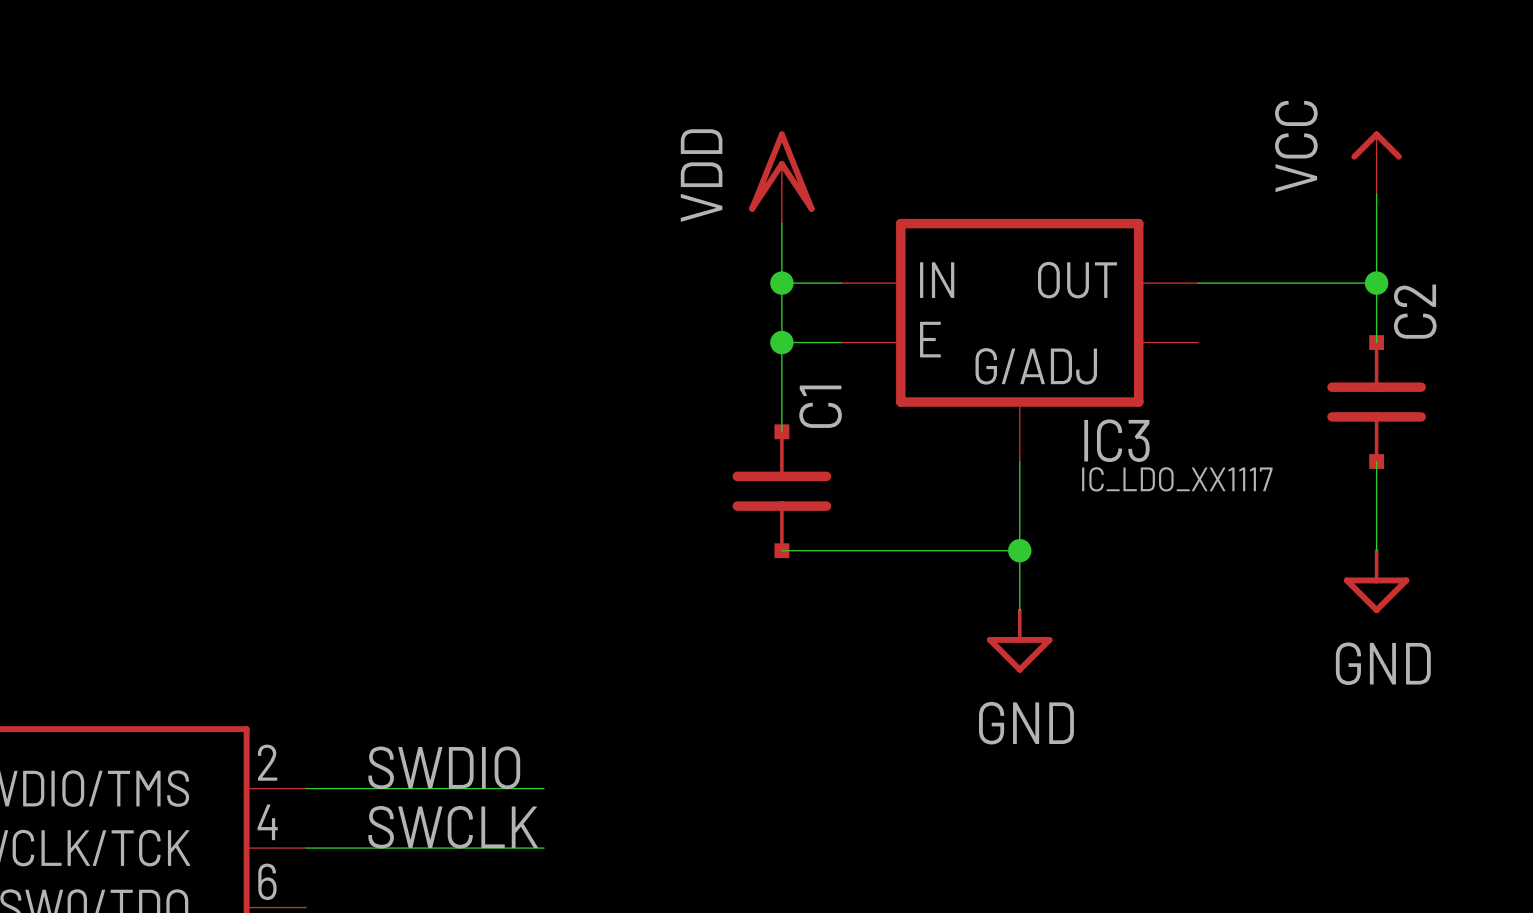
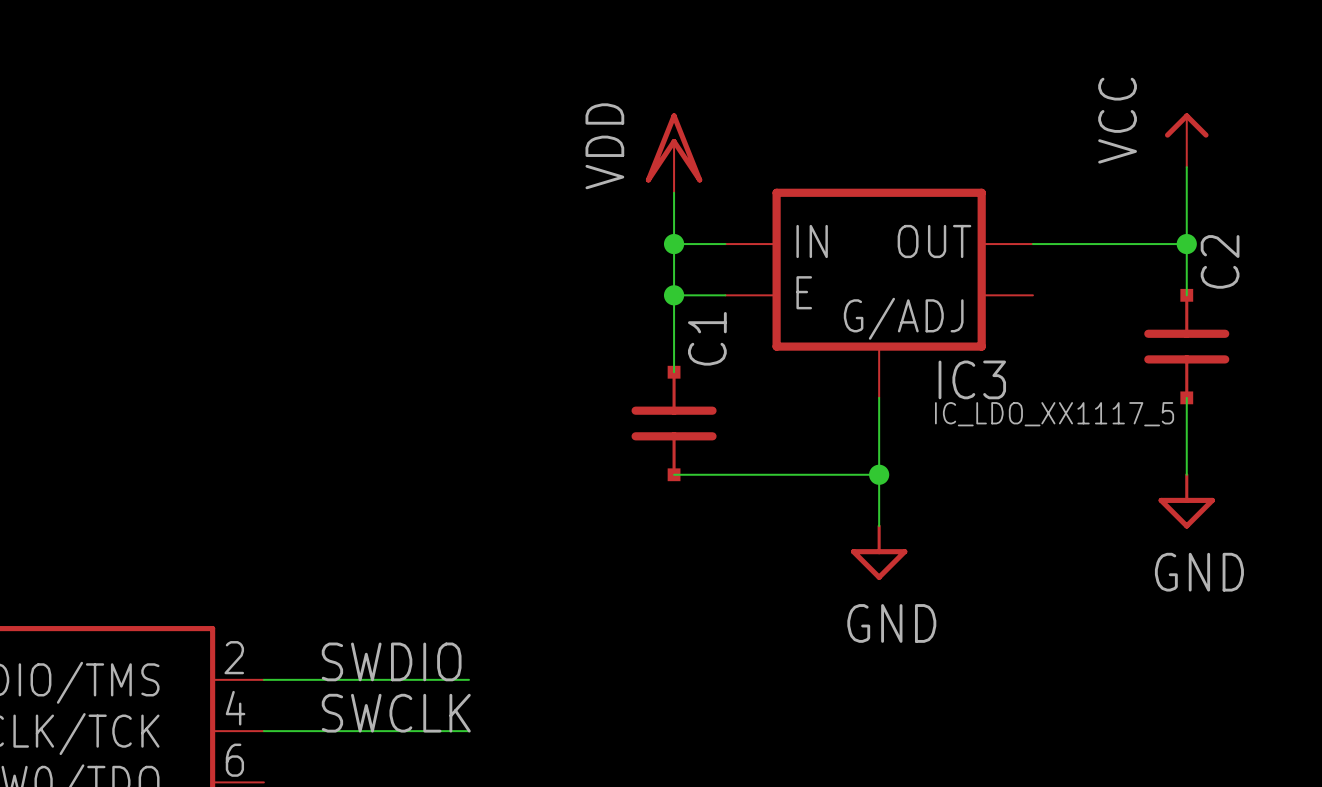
IC3 value: IC_LDO_XX1117 (1177, 479) -> IC_LDO_XX1117_5 (1054, 414)

